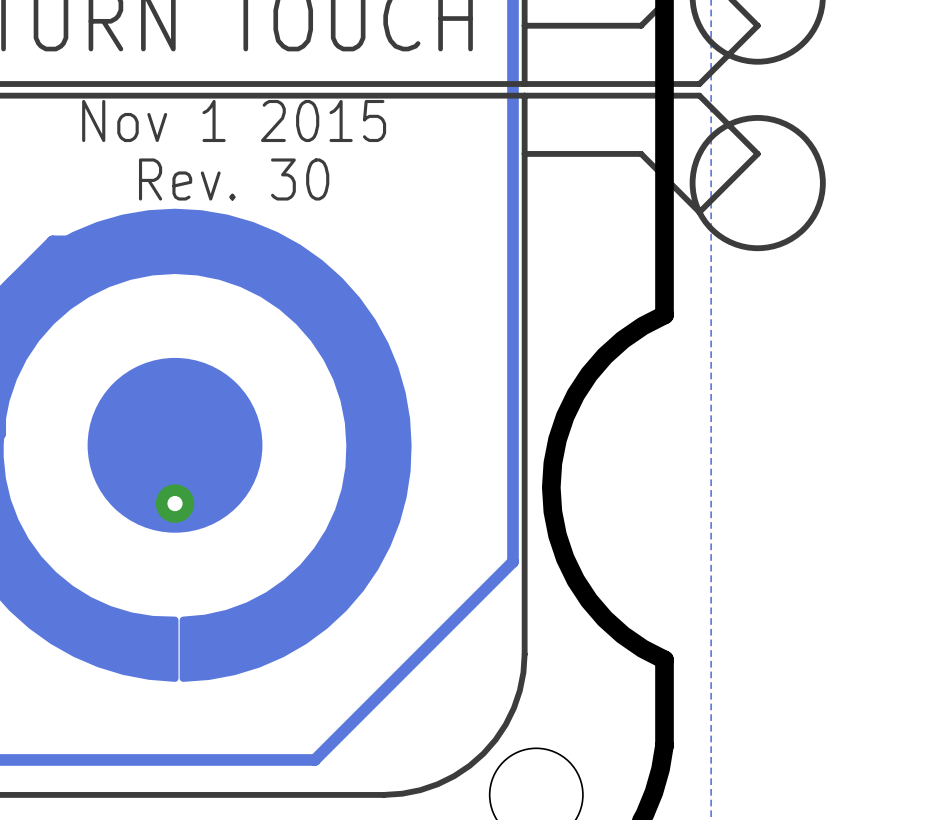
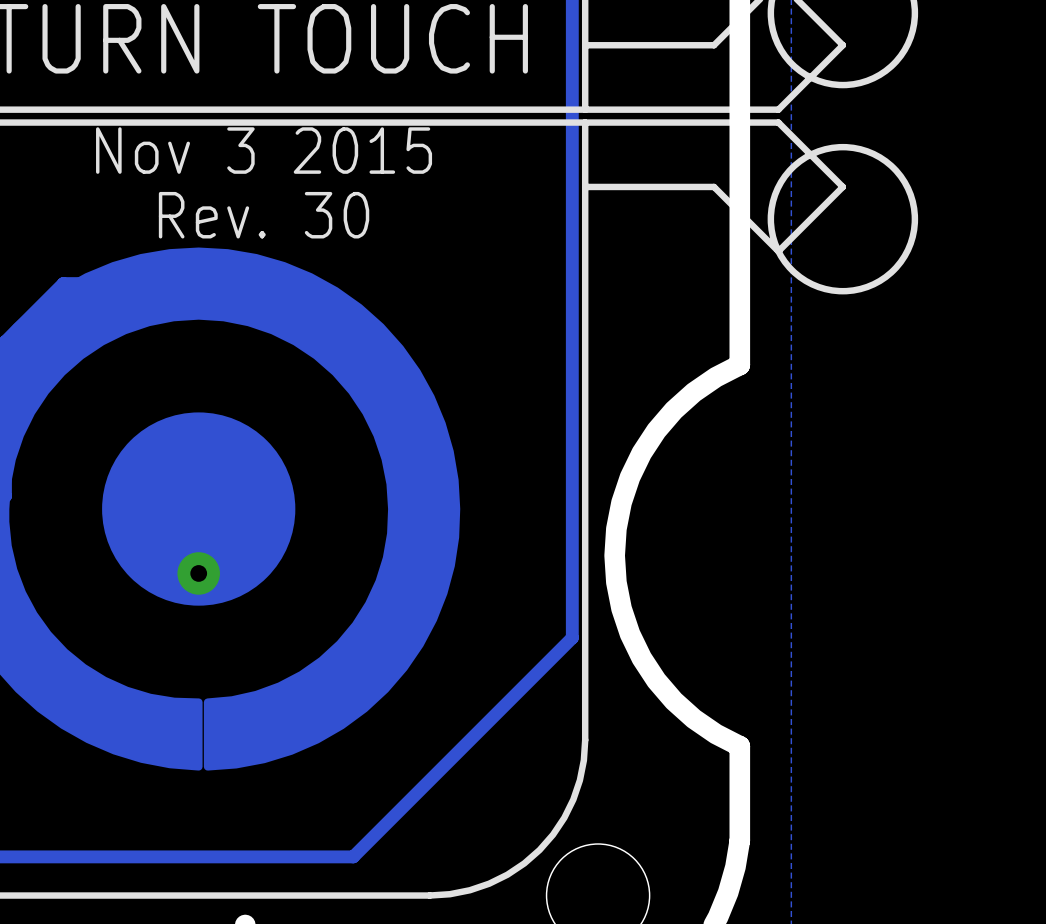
text: Nov 1 2015 (234, 120) -> Nov 3 2015 (264, 150)

